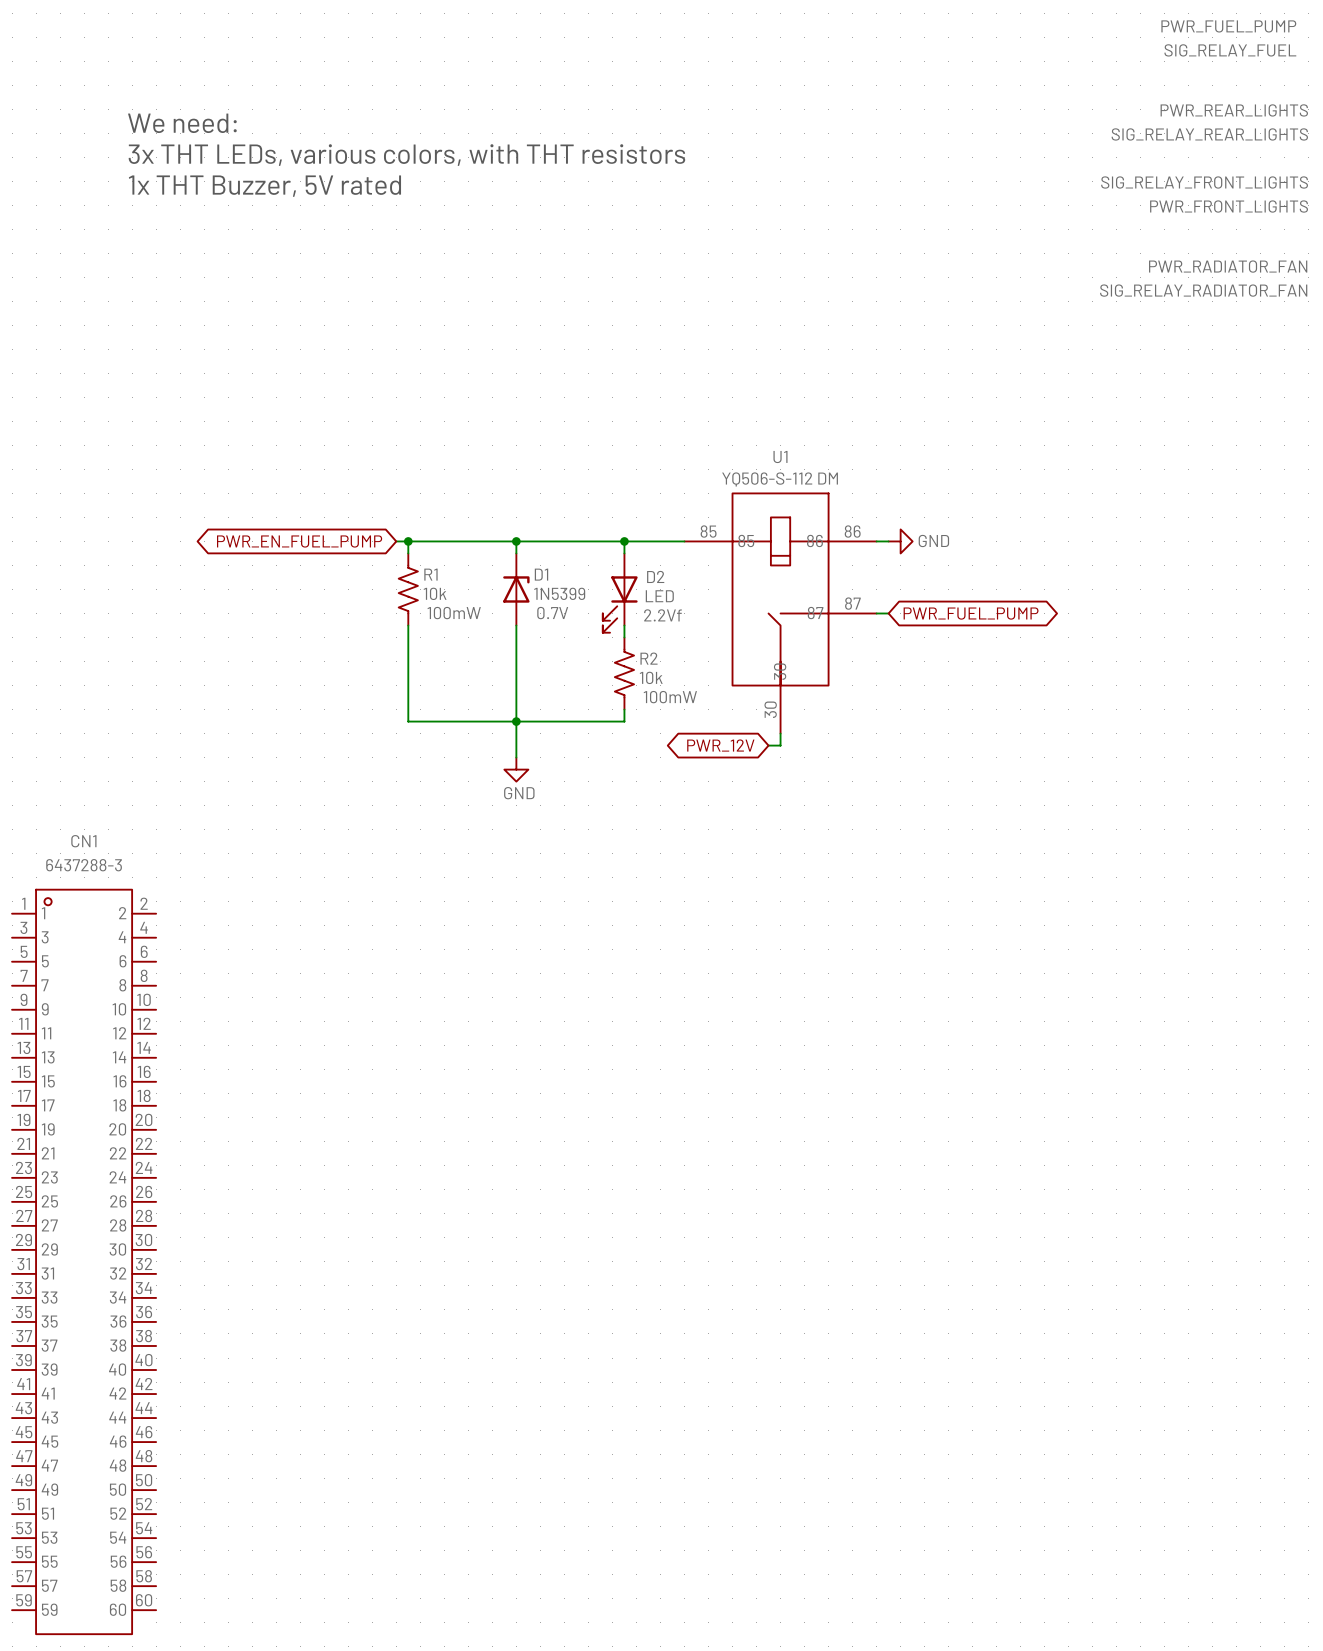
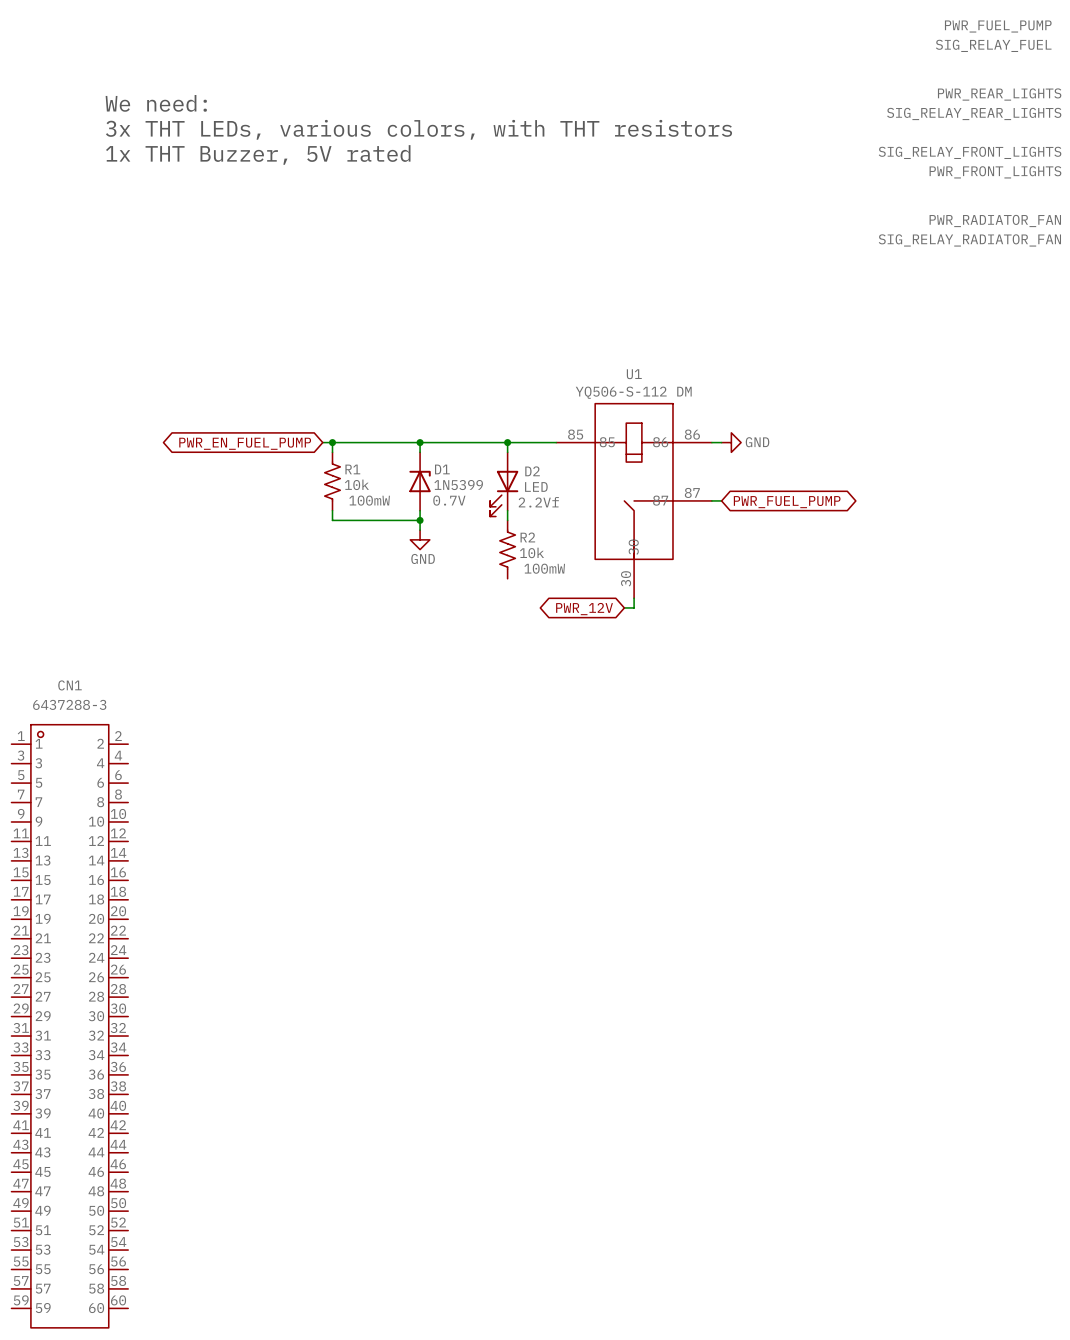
wire: (408, 637) (408, 721) (624, 721) (624, 709) -> (332, 520) (420, 520)
junction: none -> (420, 520)
wire: (516, 649) (516, 757) -> none
junction: (516, 721) -> none
power symbol position: GND (516, 769) -> GND (420, 539)

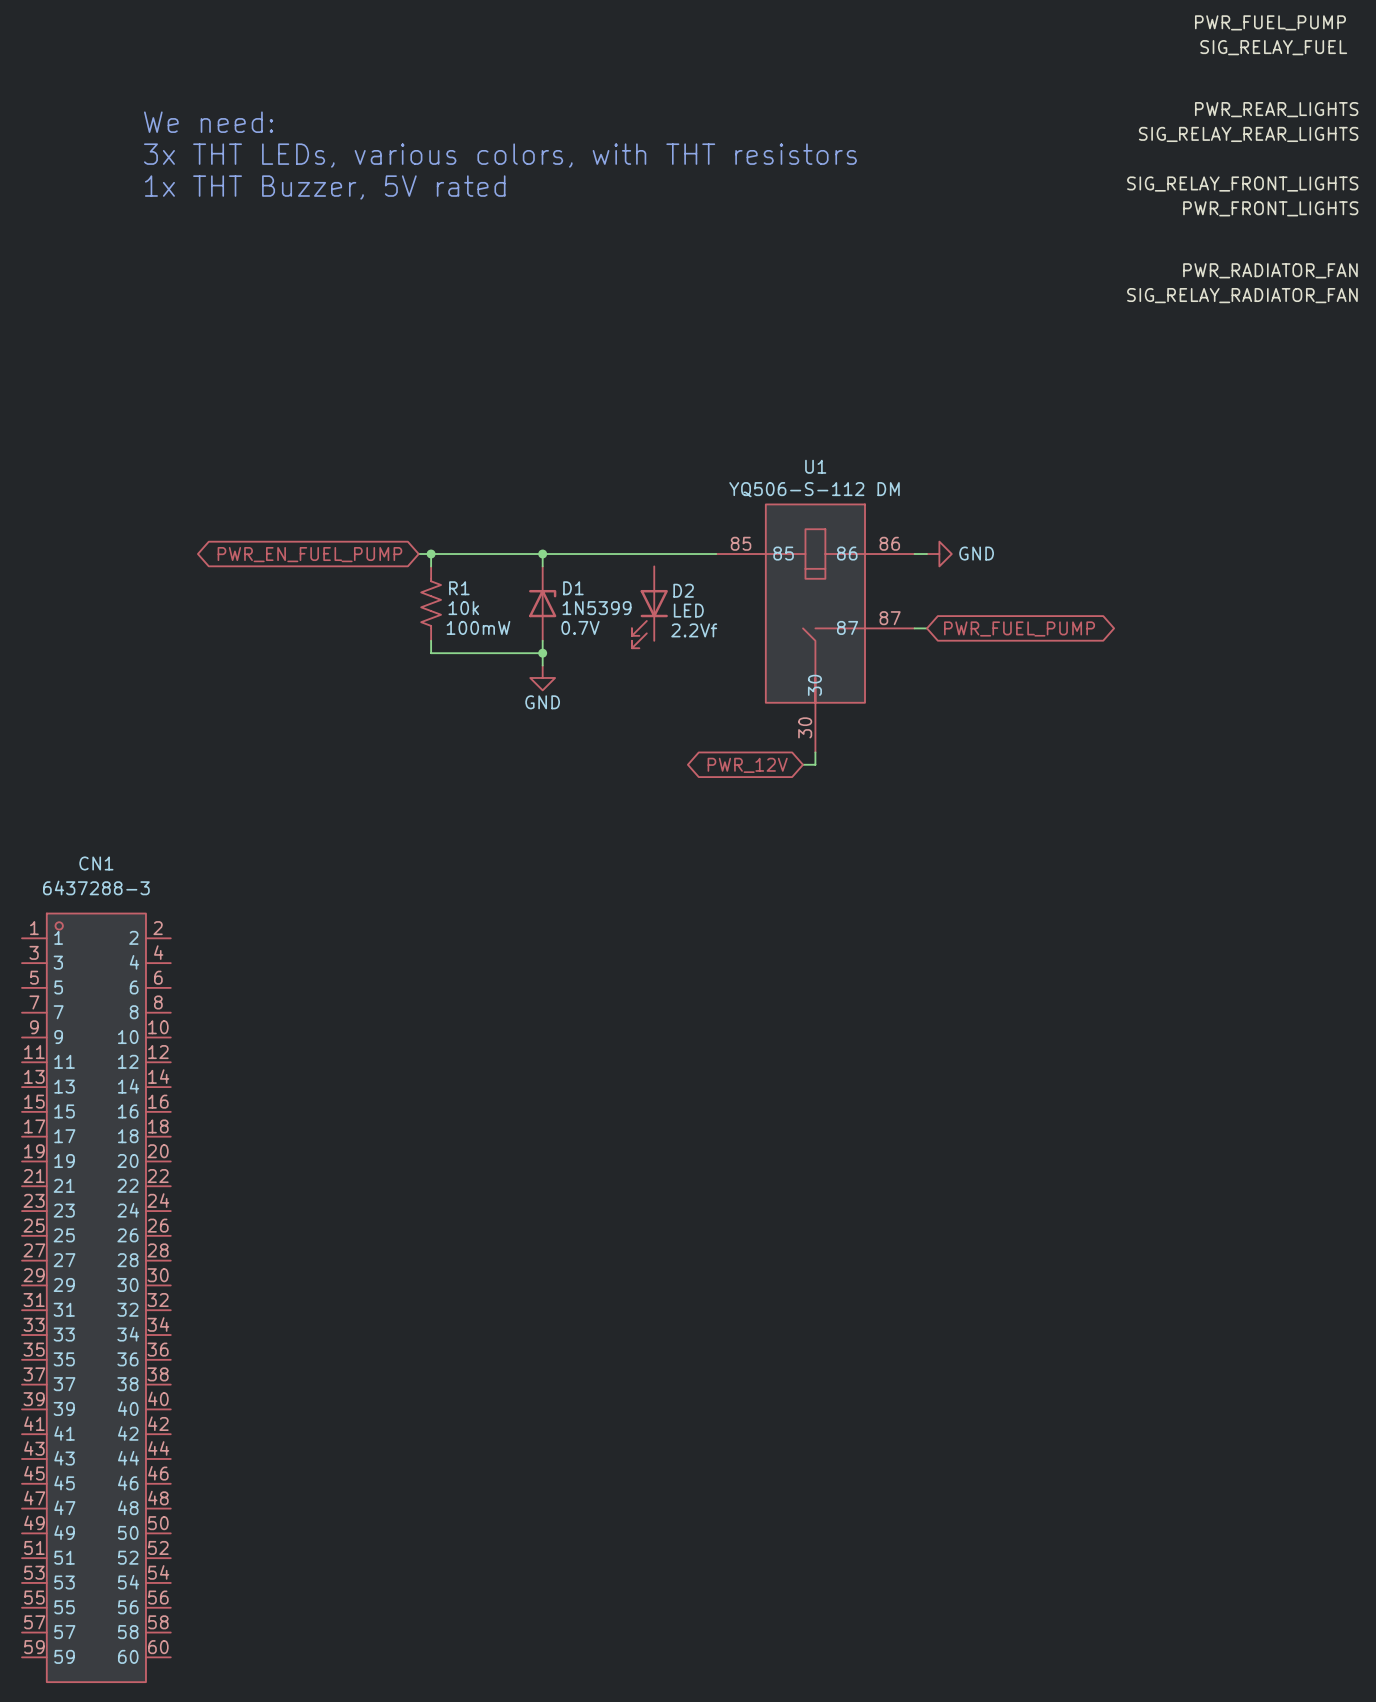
wire: (507, 442) (507, 452) -> none
junction: (507, 442) -> none
wire: (507, 510) (507, 520) -> none
R2: 10k (507, 549) -> none

